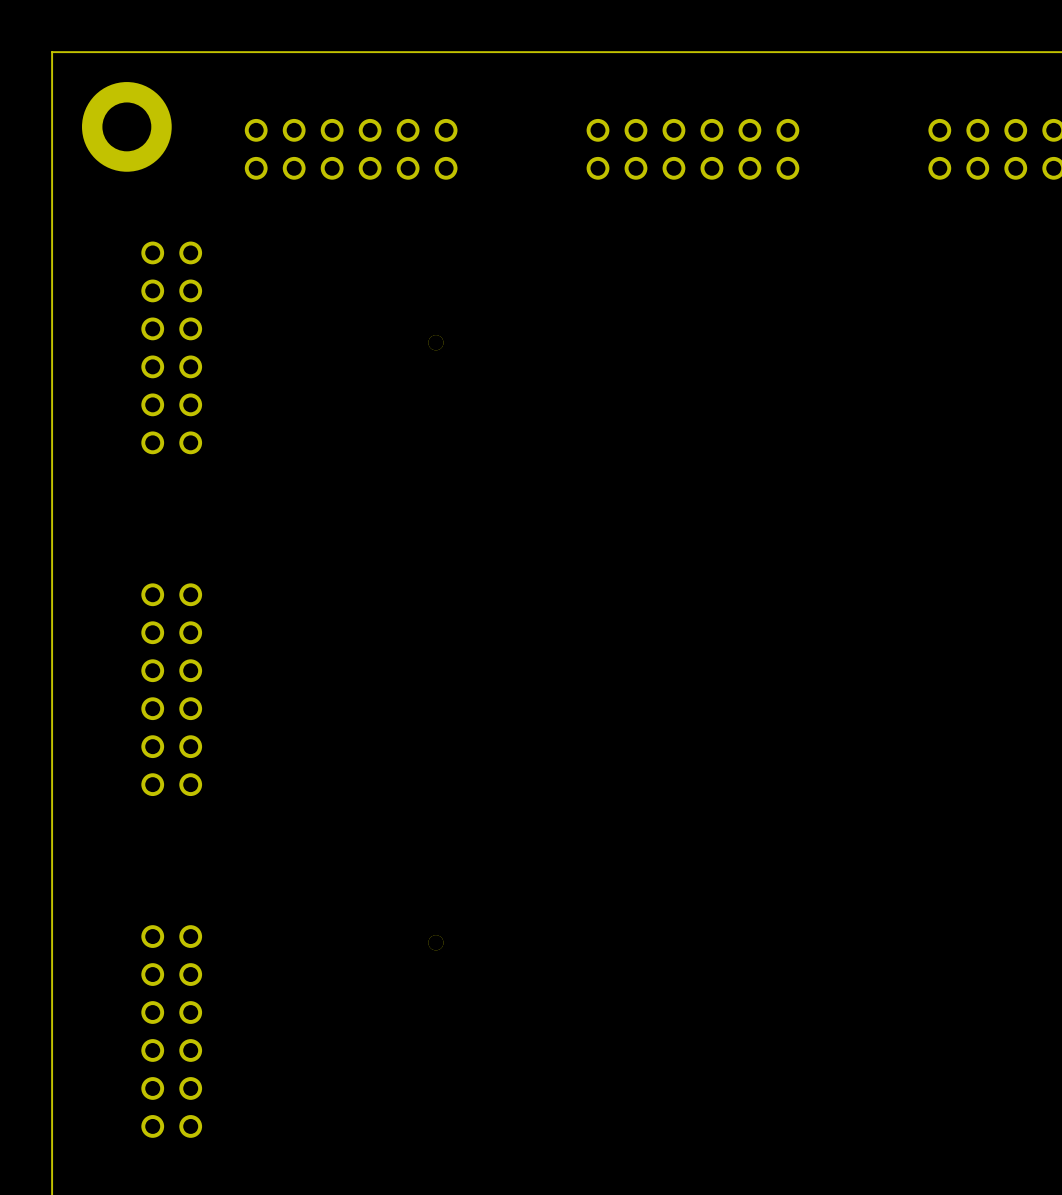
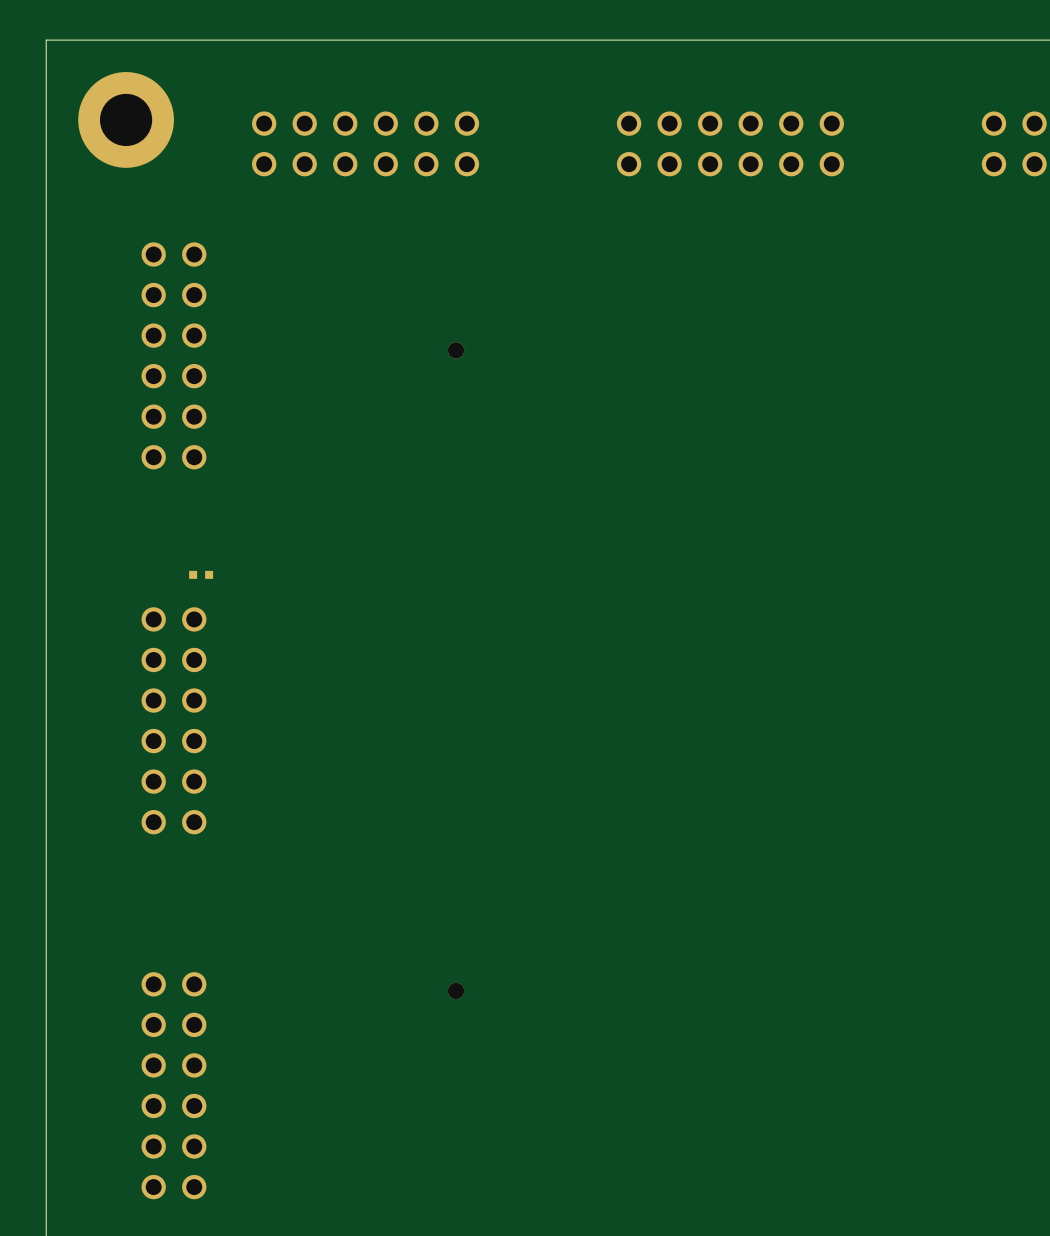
part: none -> (201, 574)

